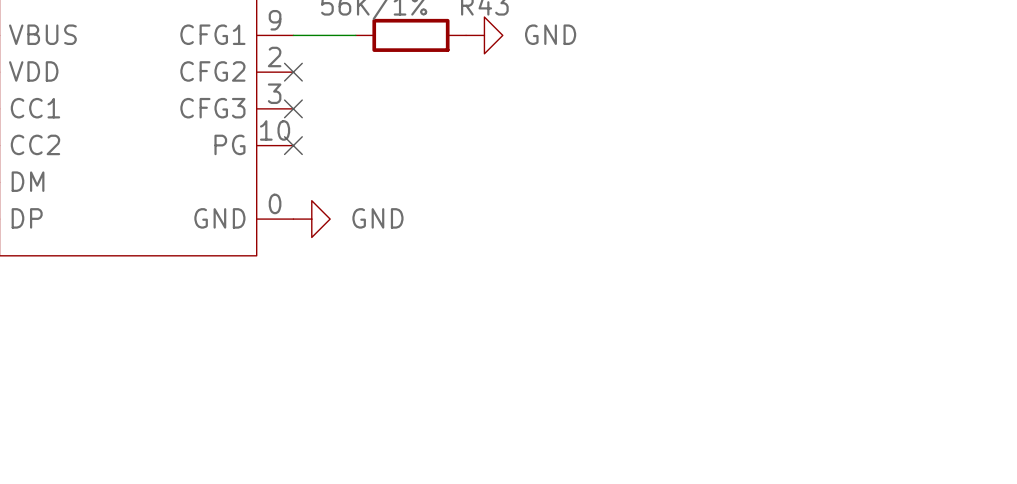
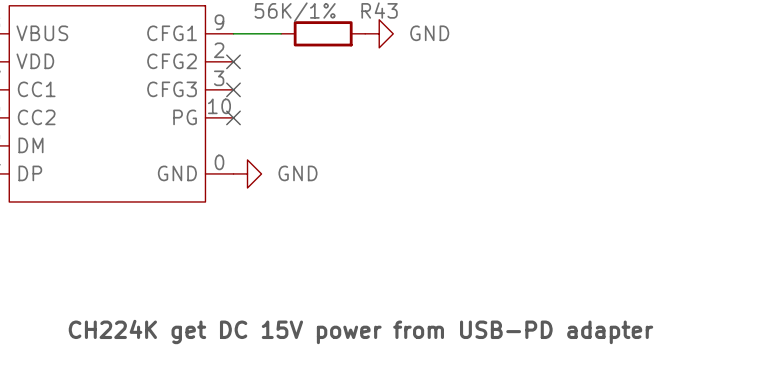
text: none -> CH224K get DC 15V power from USB-PD adapter (360, 331)

